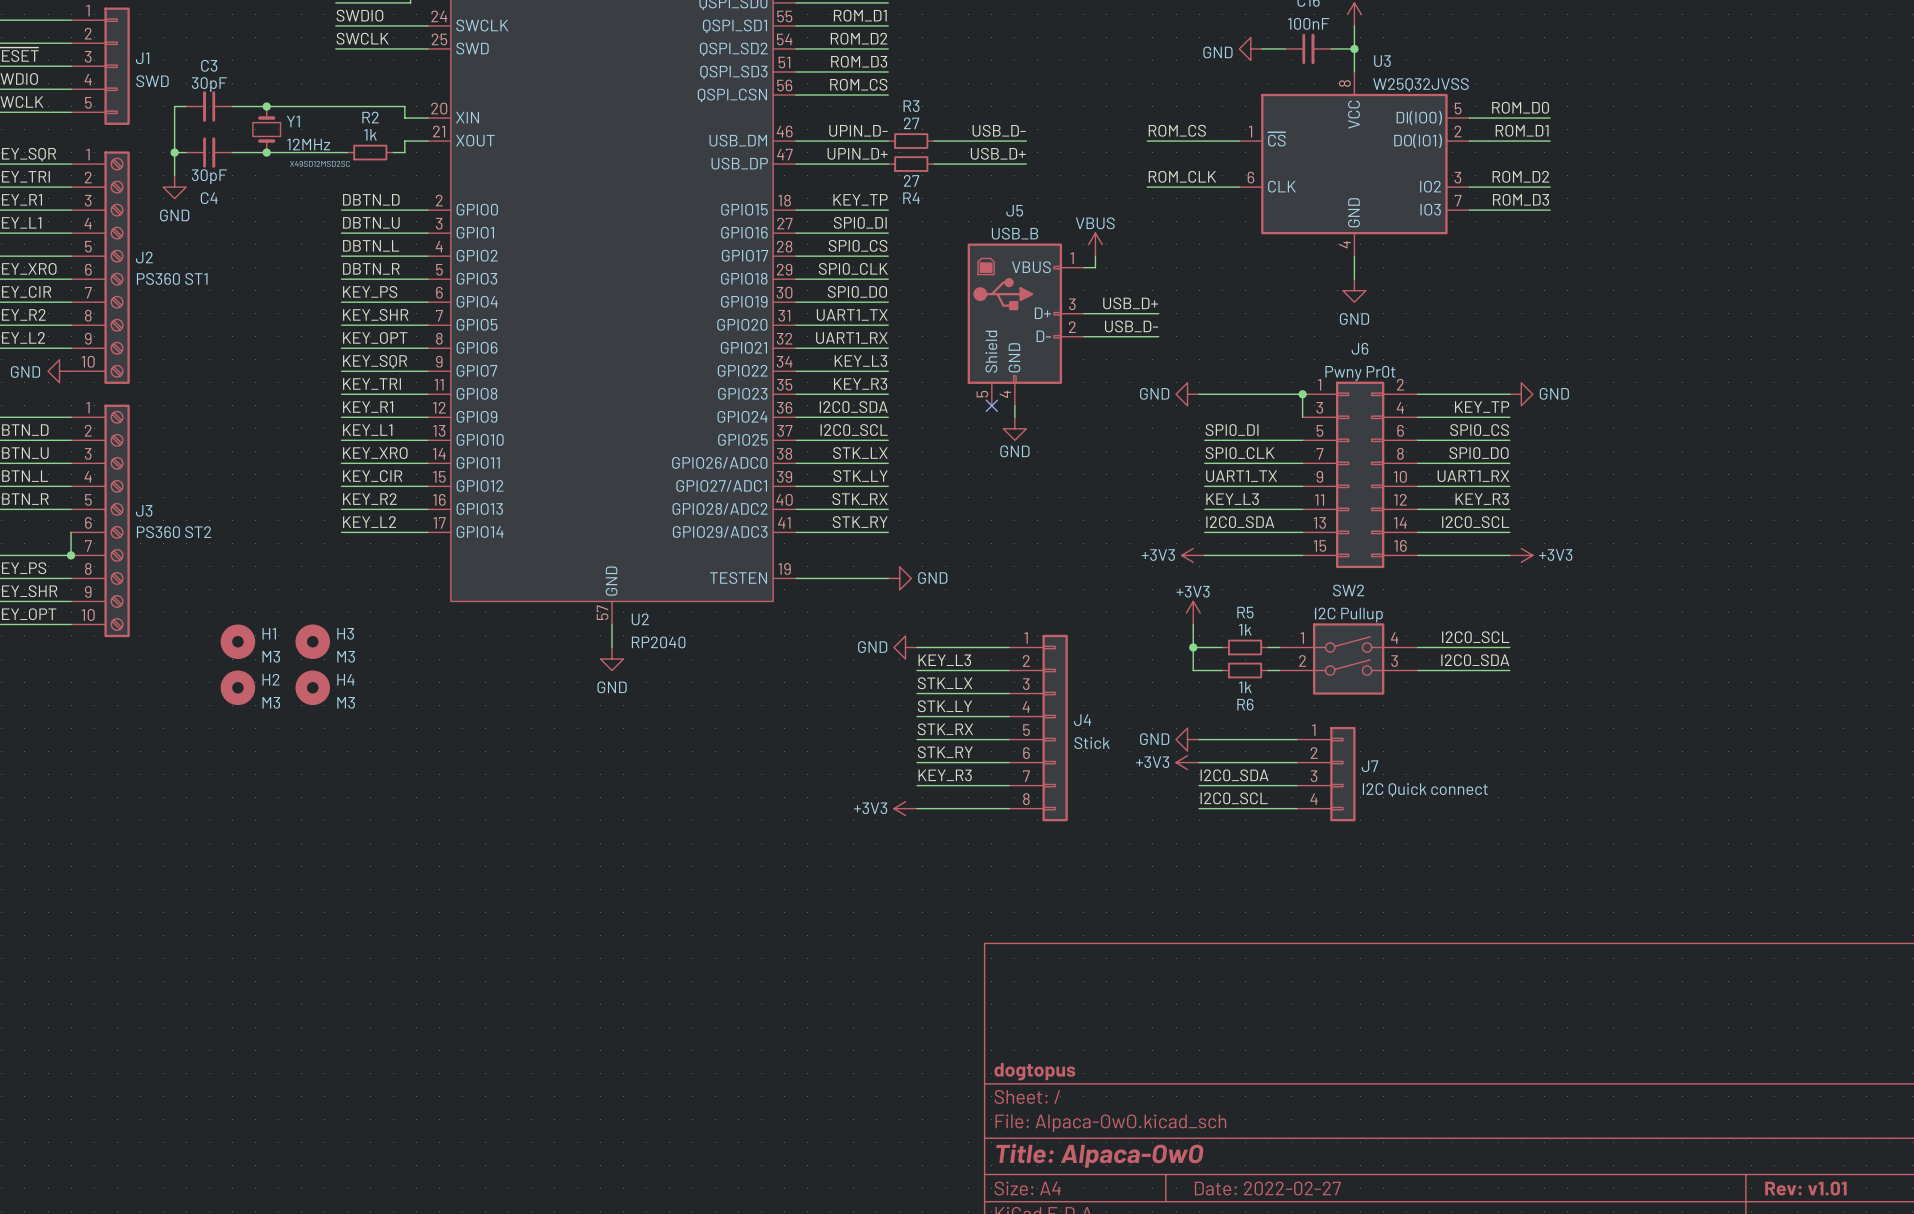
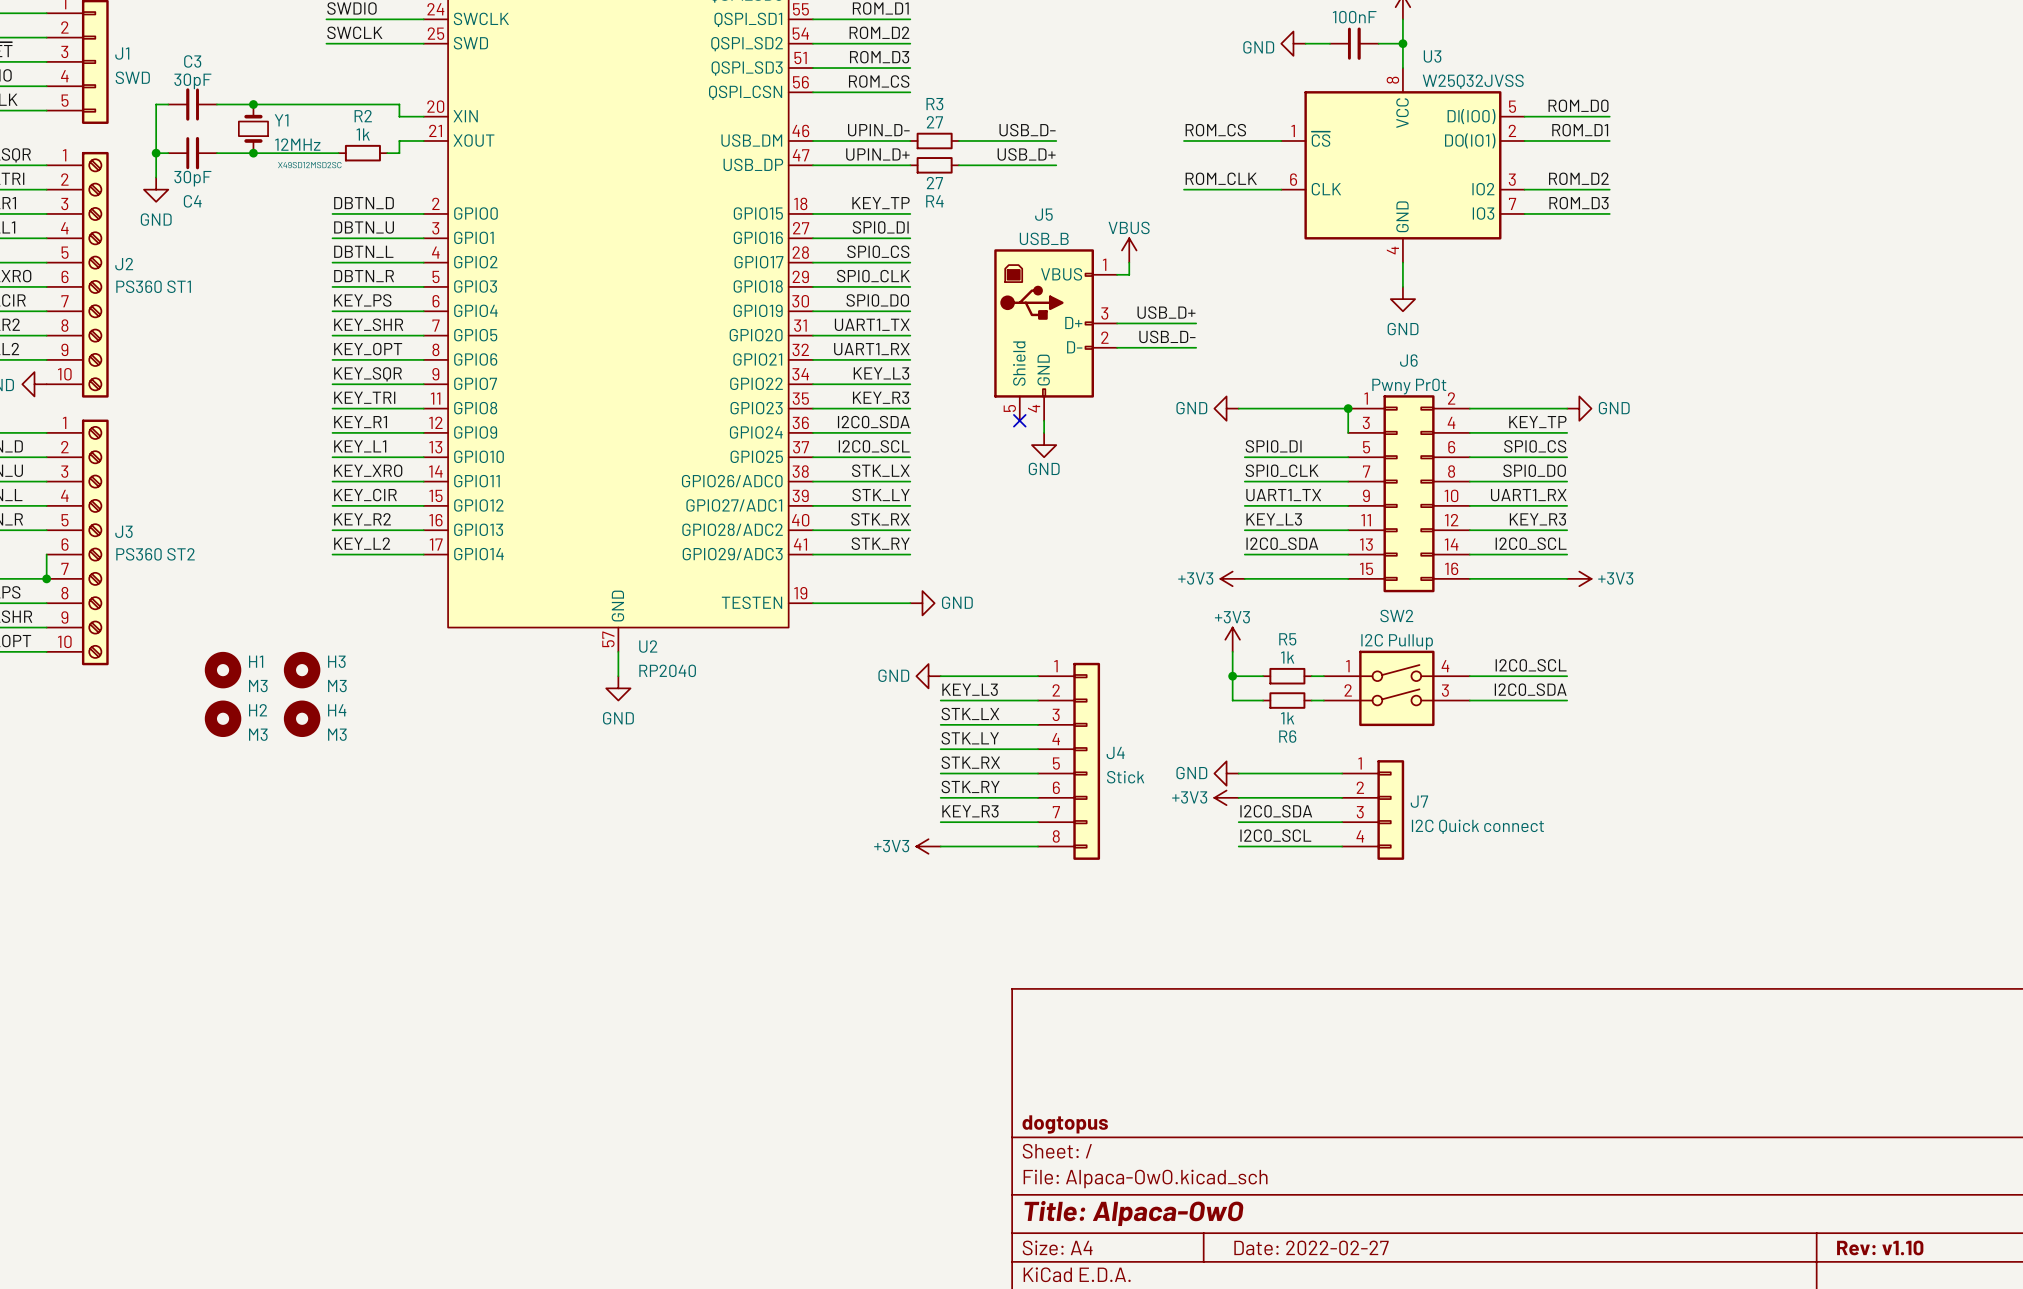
title block: Rev: v1.01 (1805, 1188) -> Rev: v1.10 (1880, 1247)

